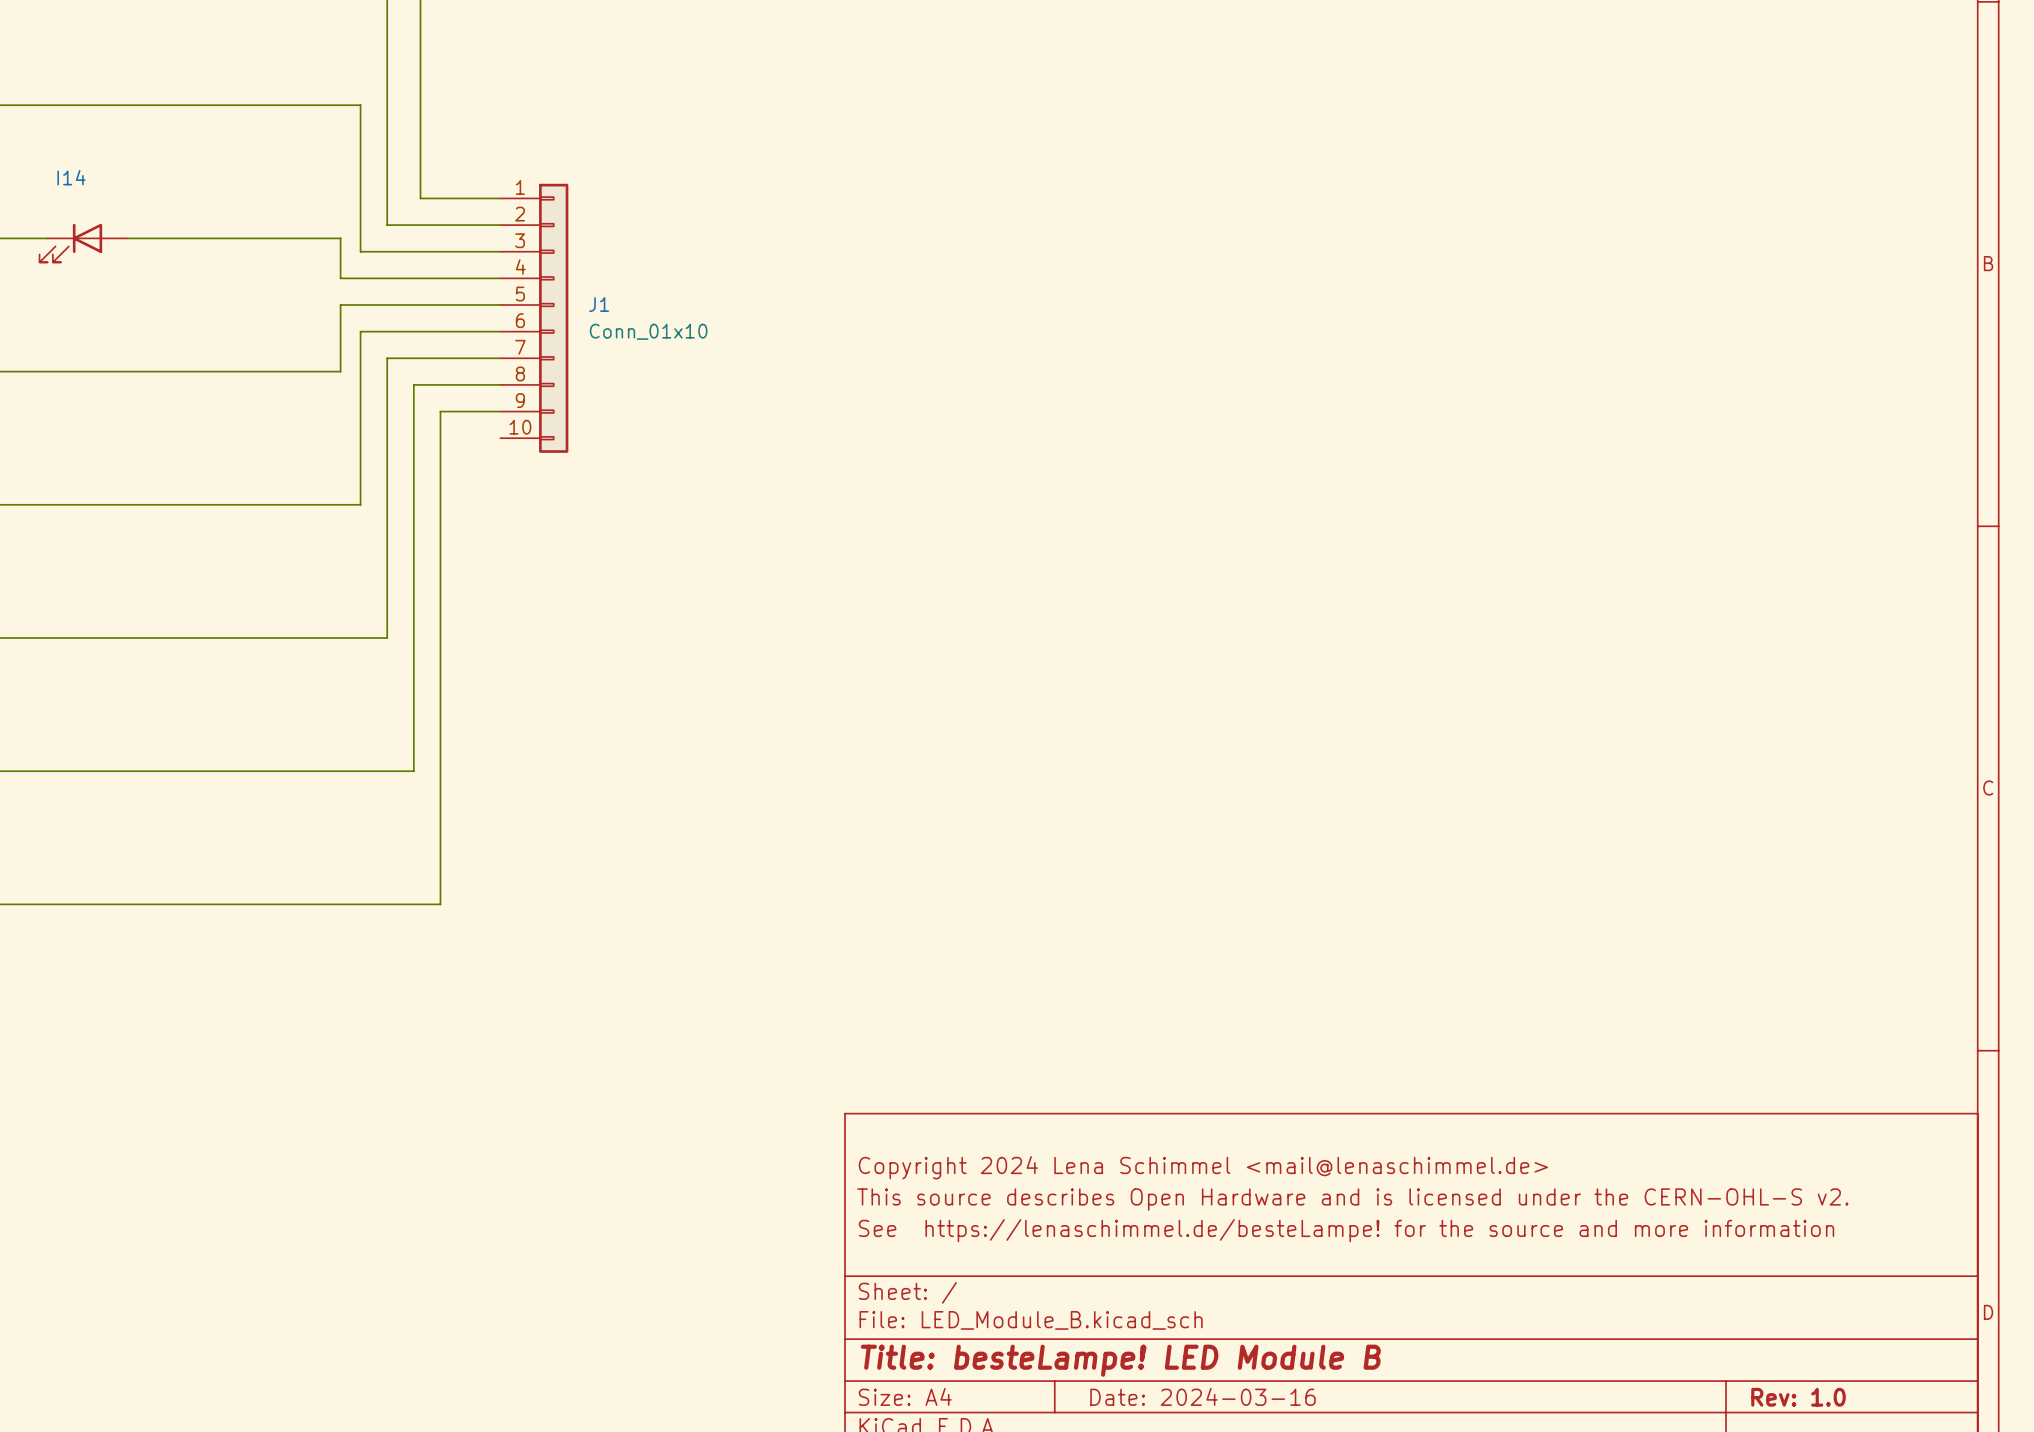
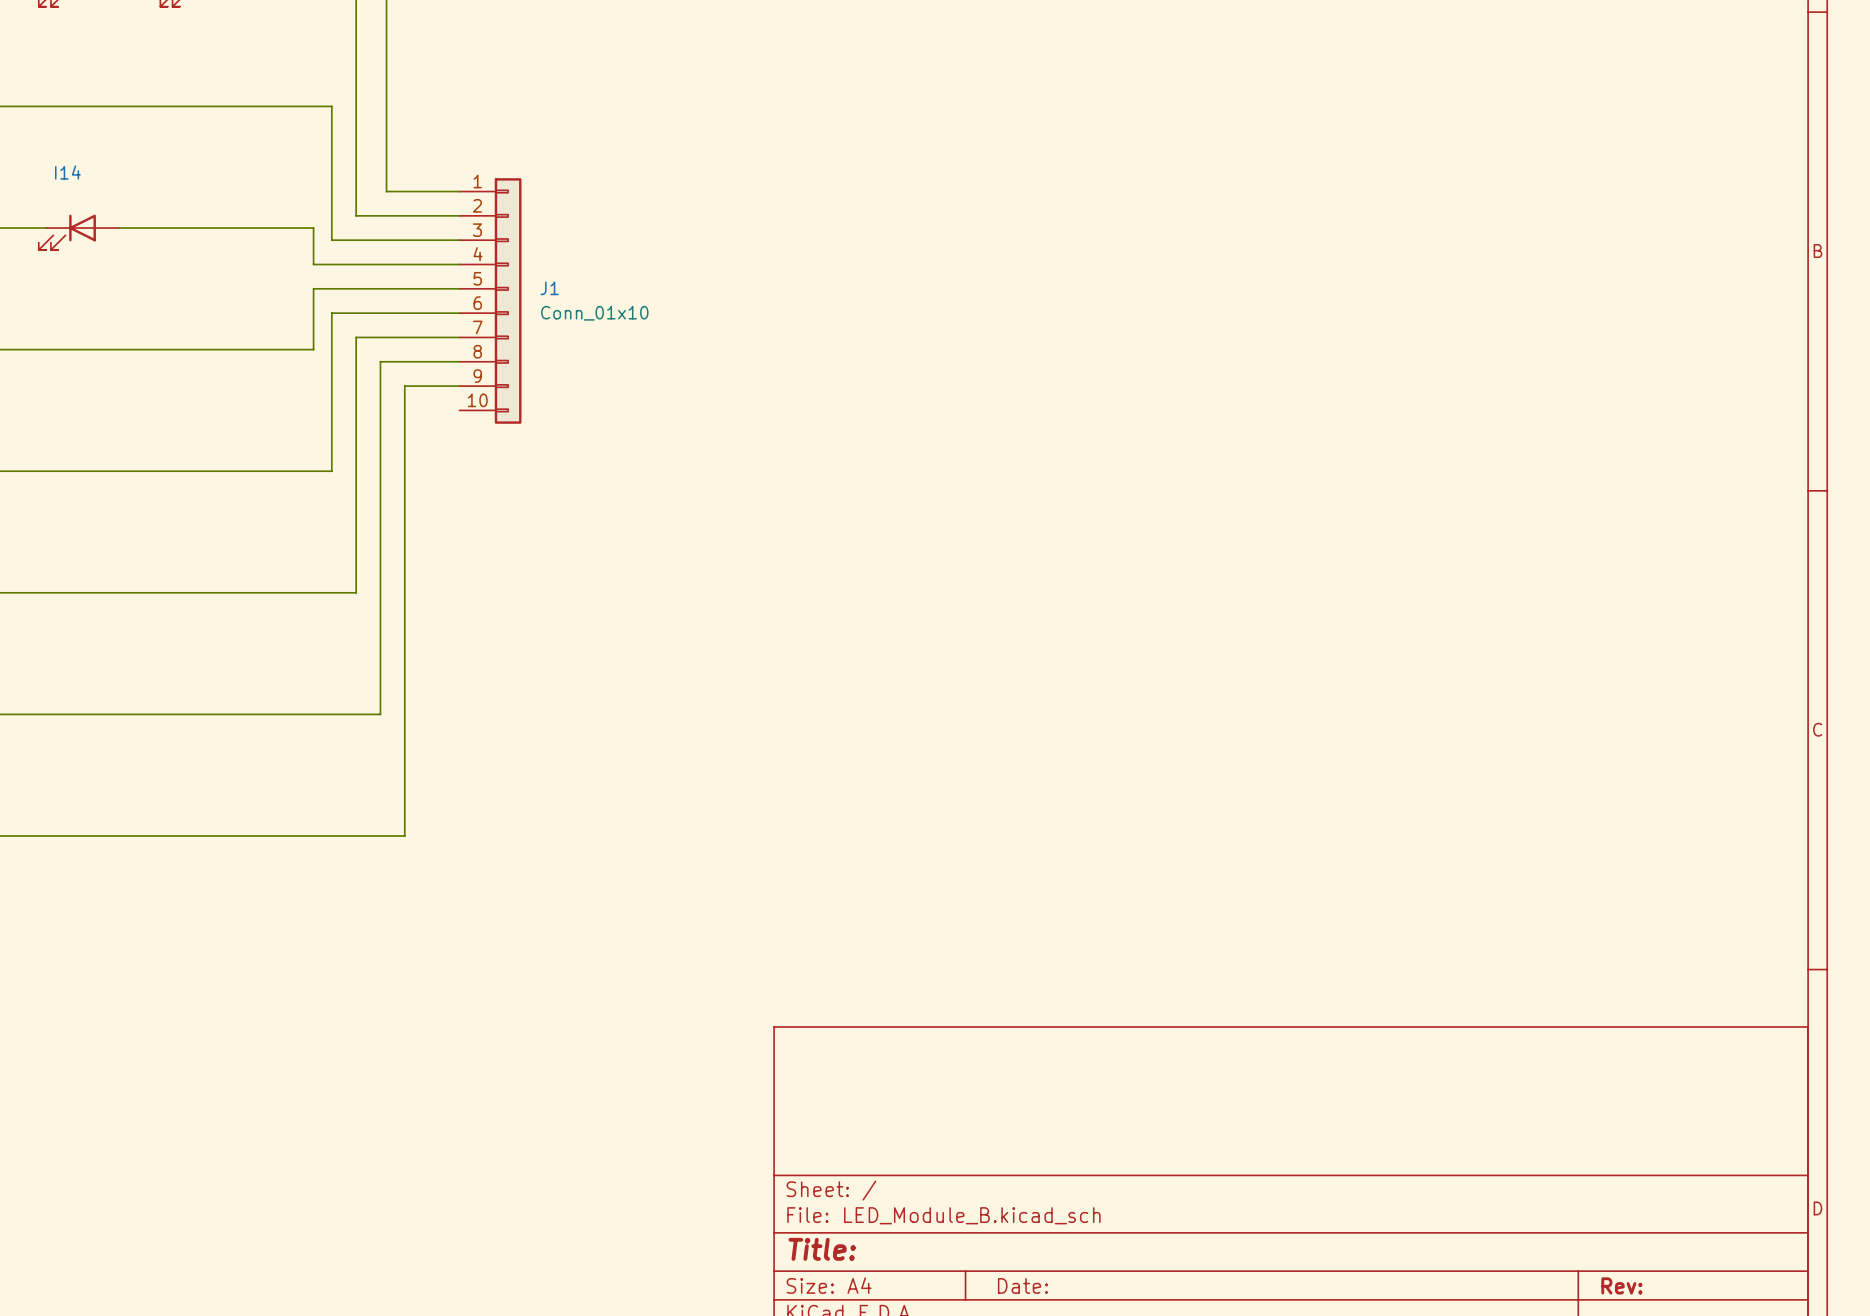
title block: Copyright 2024 Lena Schimmel <mail@lenaschimmel.de> (1203, 1167) -> none
title block: This source describes Open Hardware and is licensed under the CERN-OHL-S v2. (1352, 1199) -> none
title block: See https://lenaschimmel.de/besteLampe! for the source and more information (1346, 1230) -> none
title block: Title: besteLampe! LED Module B (1120, 1360) -> Title: (822, 1249)
title block: Date: 2024-03-16 (1203, 1396) -> Date: (1022, 1285)
title block: Rev: 1.0 (1798, 1397) -> Rev: (1621, 1285)

